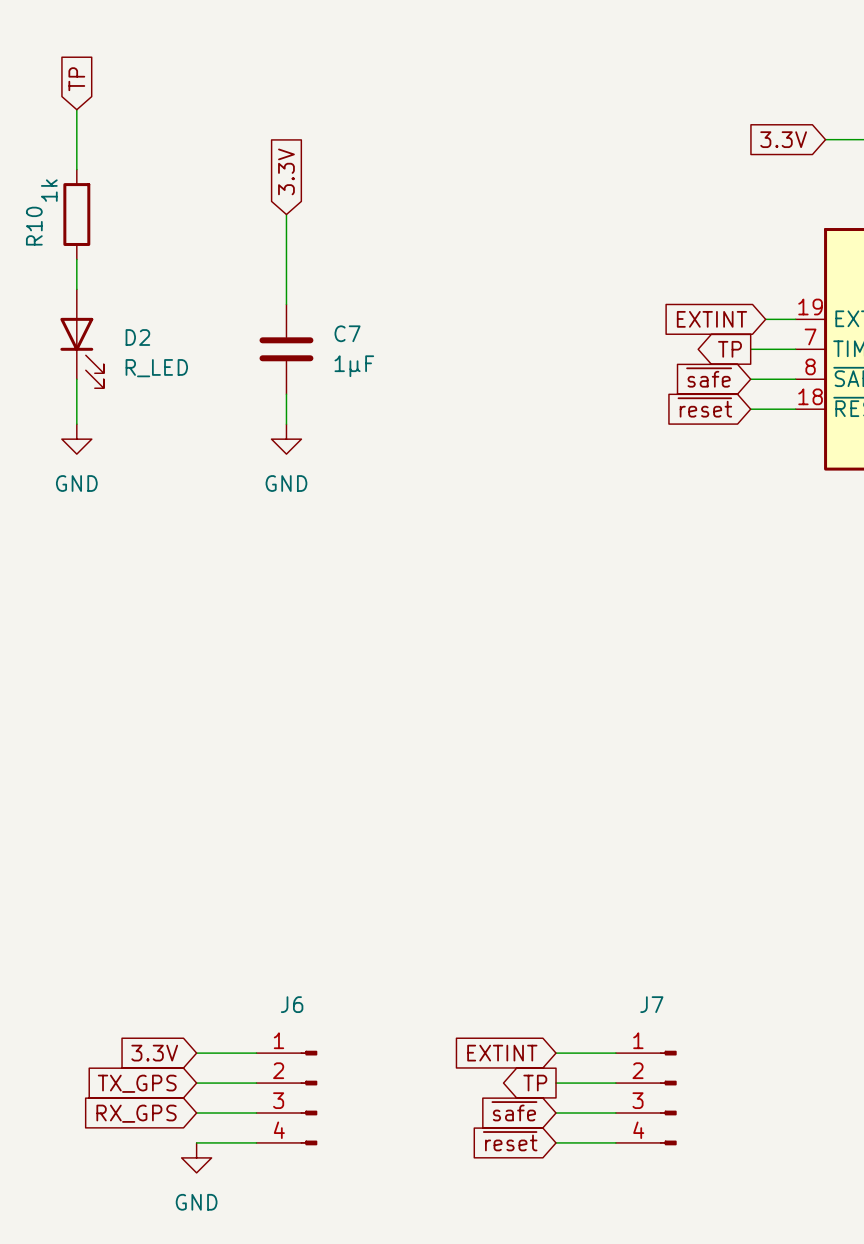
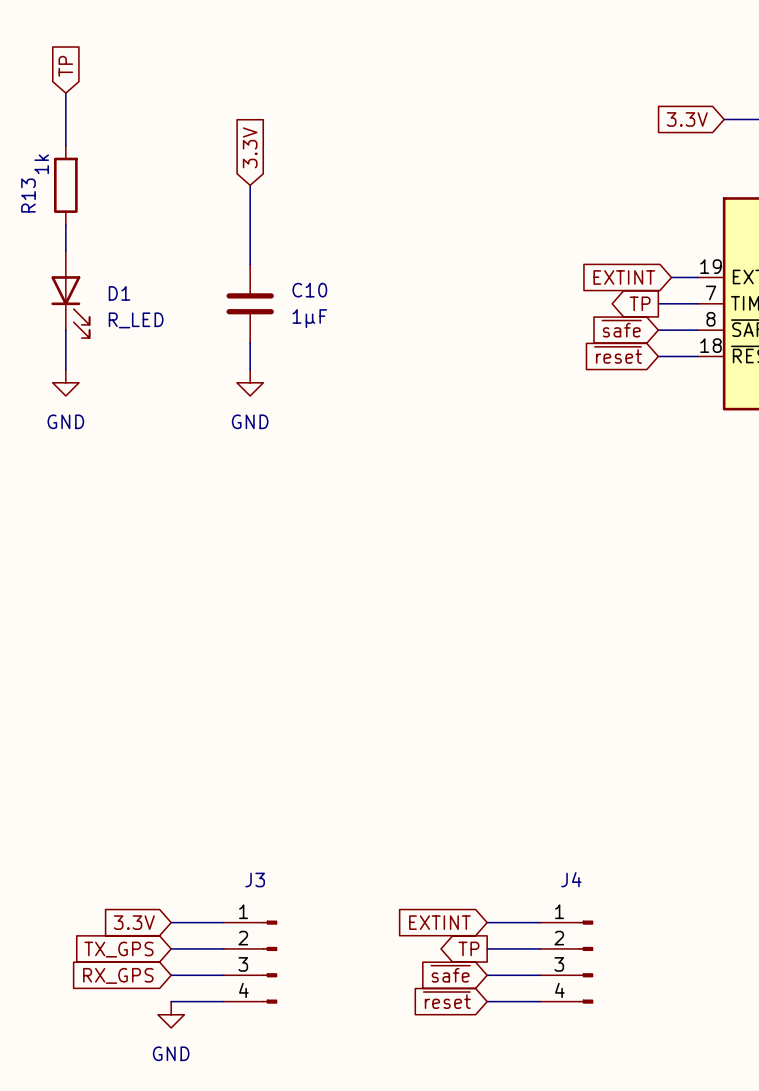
R10 name: R10 (34, 226) -> R13 (28, 195)
C7 name: C7 (347, 333) -> C10 (309, 290)
D2 name: D2 (137, 337) -> D1 (119, 293)
J6 name: J6 (292, 1004) -> J3 (255, 879)
J7 name: J7 (651, 1004) -> J4 (571, 879)

